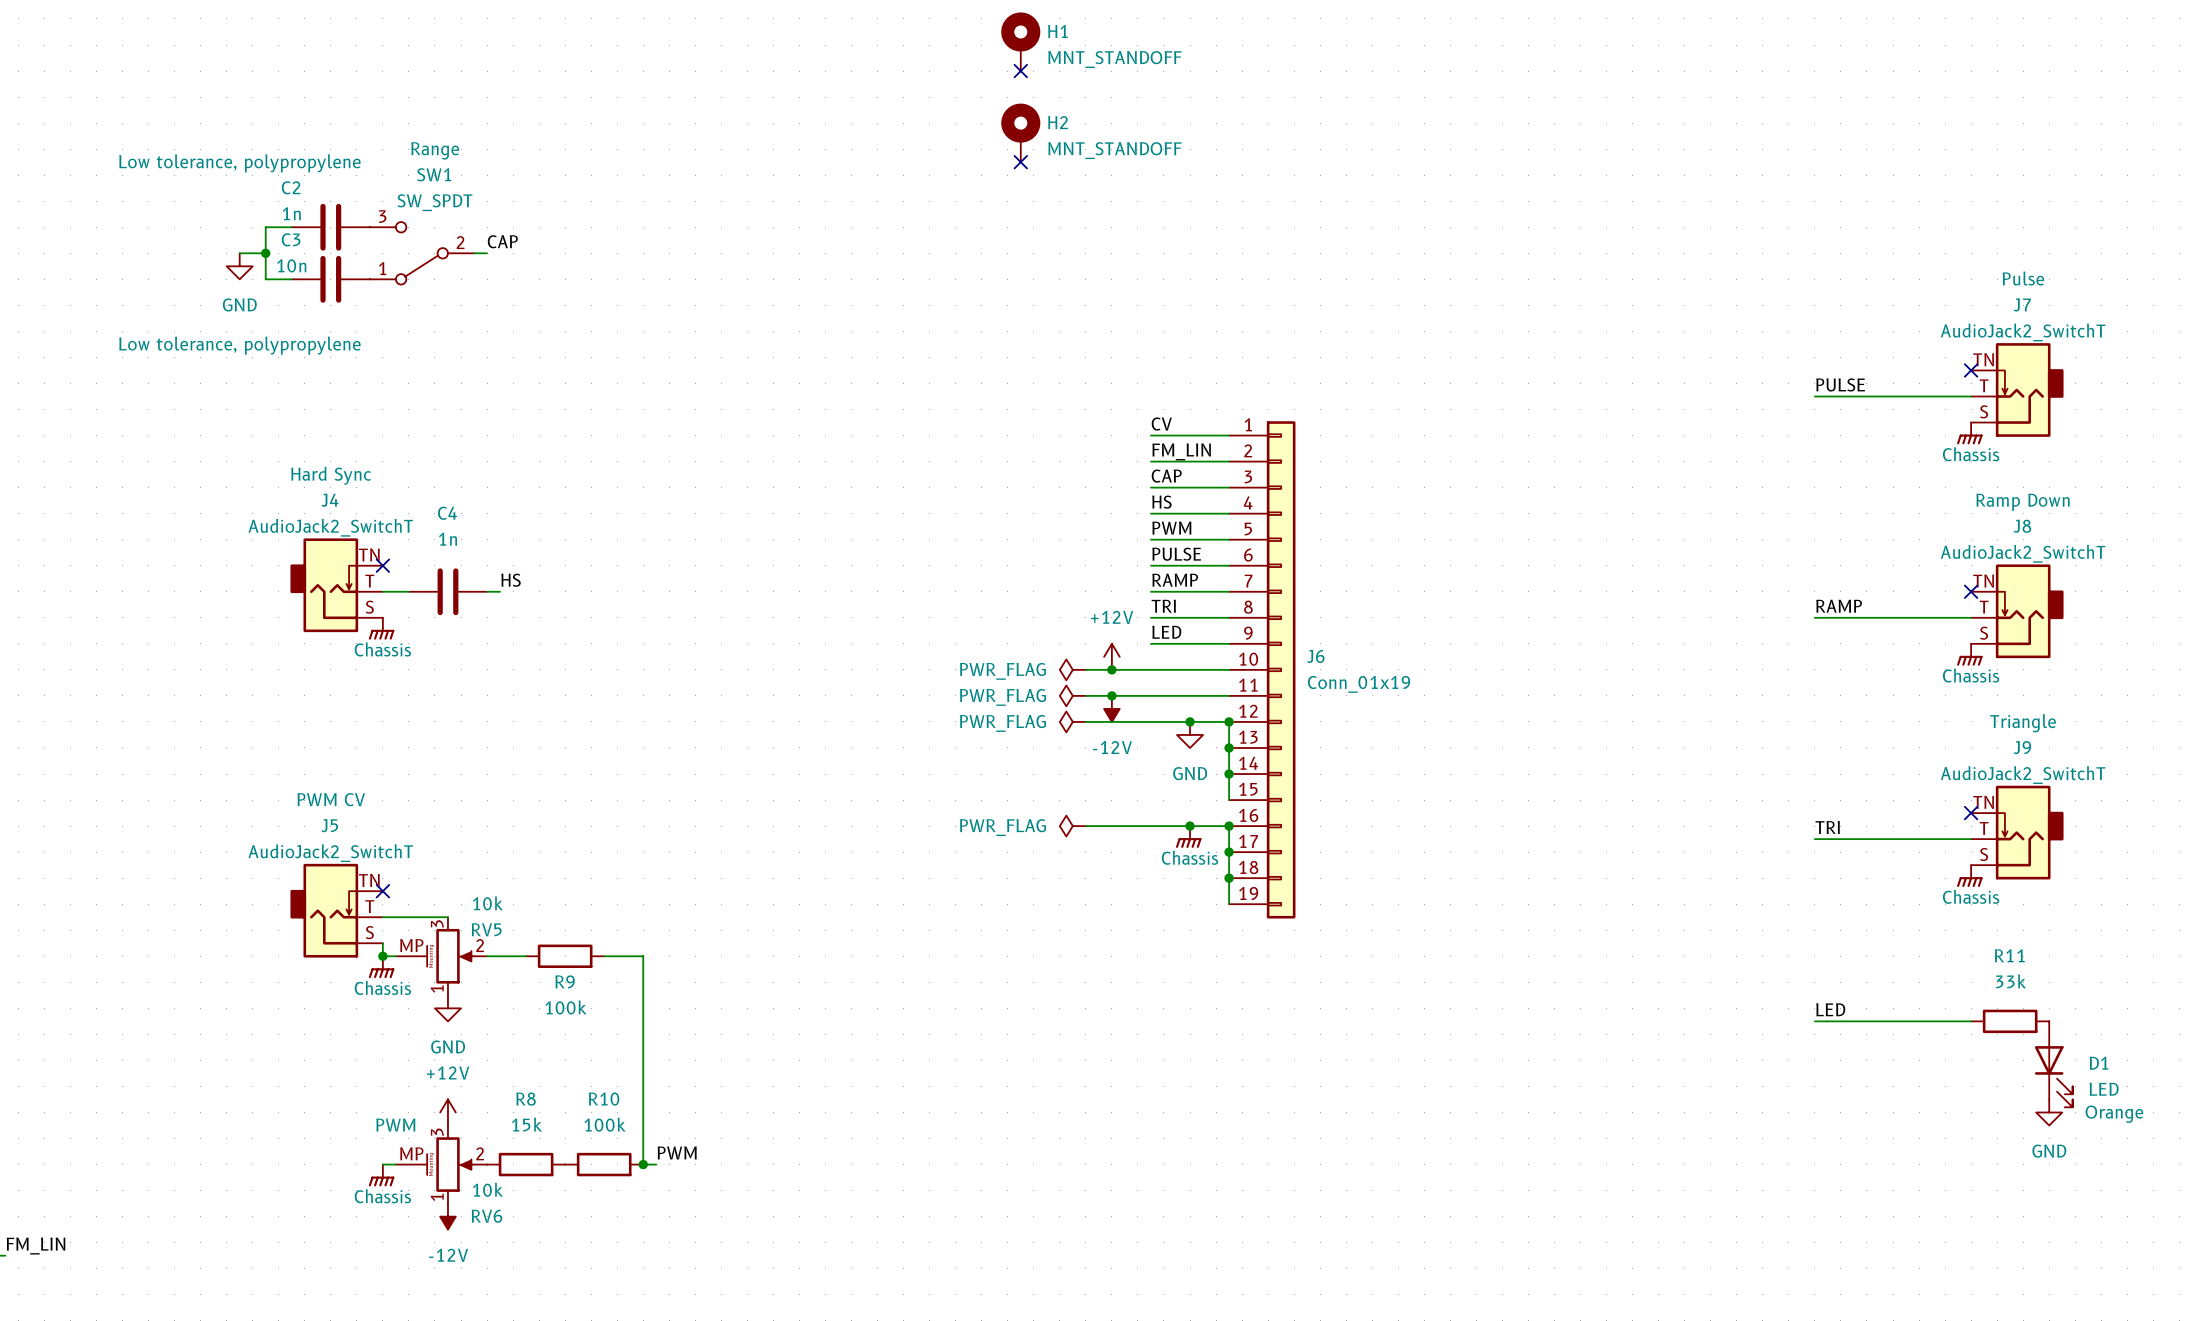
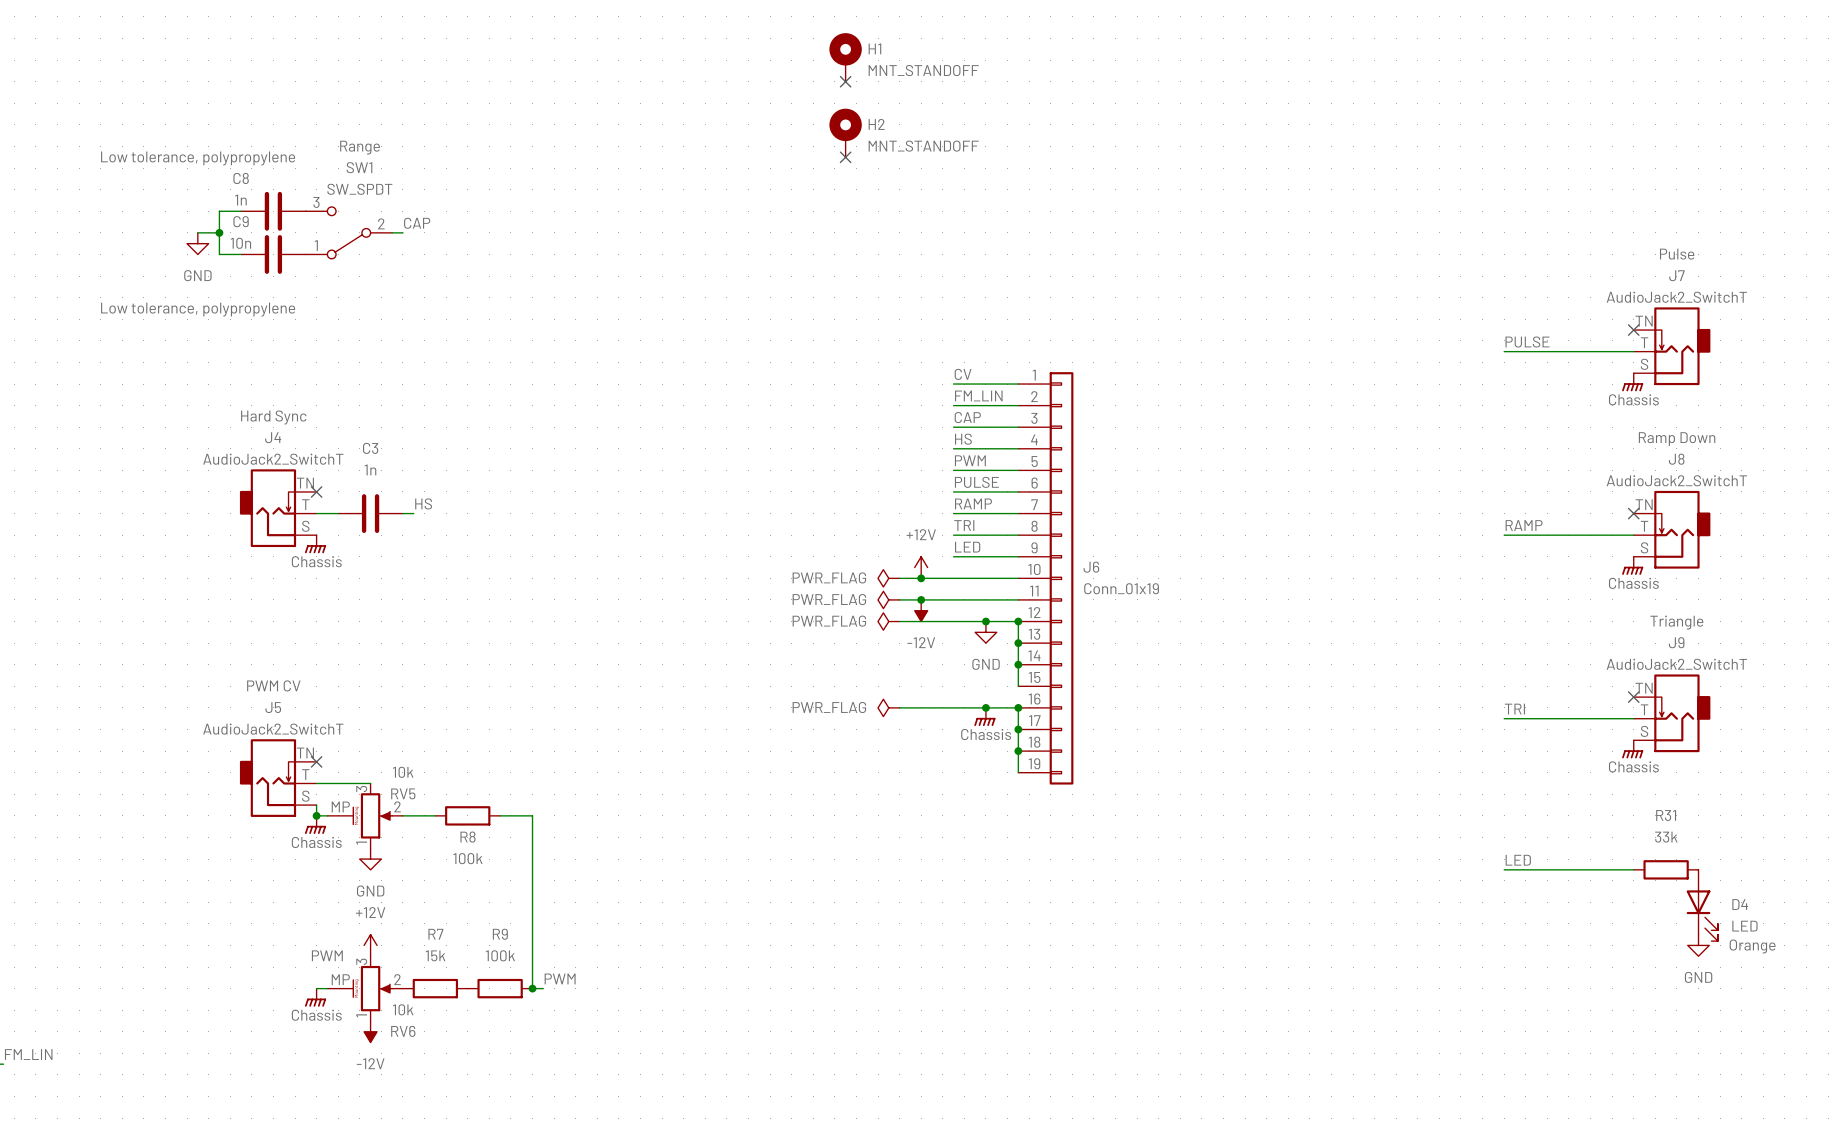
C2 name: C2 (291, 187) -> C8 (241, 178)
C3 name: C3 (291, 239) -> C9 (241, 221)
C4 name: C4 (447, 513) -> C3 (370, 448)
R11 name: R11 (2009, 955) -> R31 (1666, 815)
R9 name: R9 (565, 981) -> R8 (467, 837)
D1 name: D1 (2099, 1063) -> D4 (1740, 904)
R8 name: R8 (526, 1099) -> R7 (435, 934)
R10 name: R10 (604, 1099) -> R9 (500, 934)

